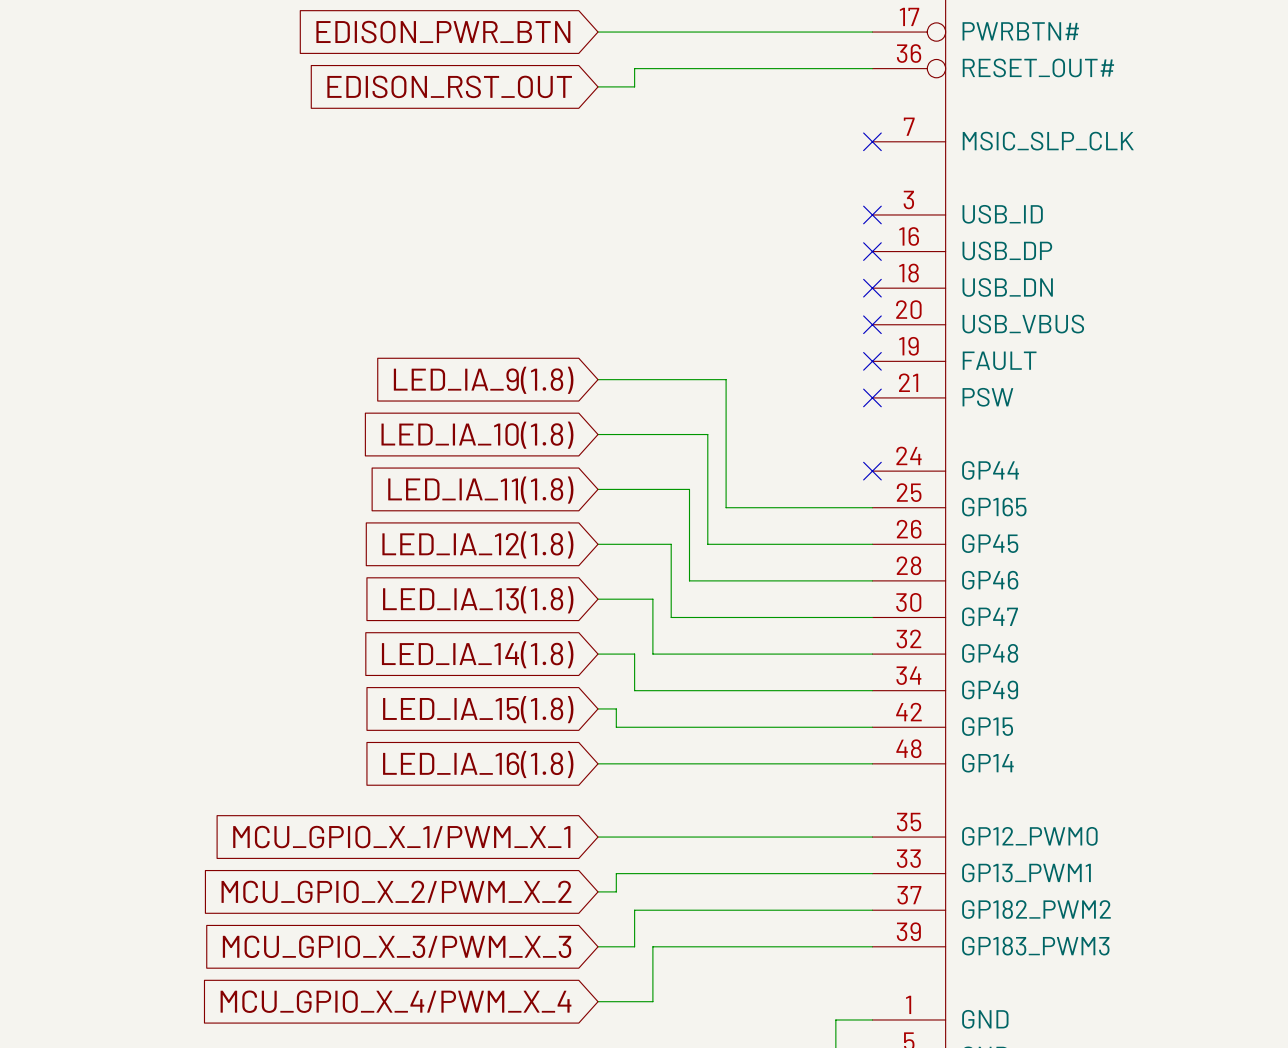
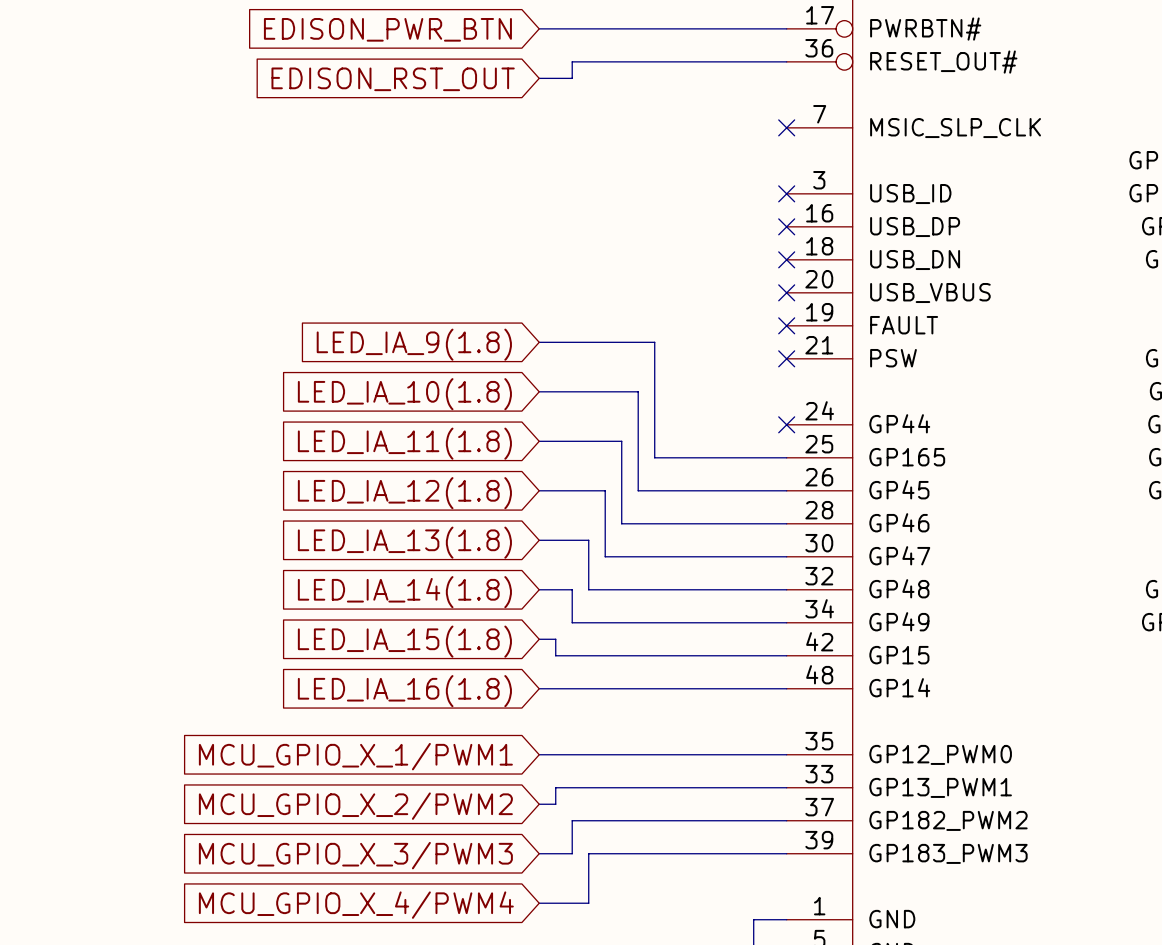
global label: MCU_GPIO_X_1/PWM_X_1 (401, 837) -> MCU_GPIO_X_1/PWM1 (355, 756)
global label: MCU_GPIO_X_2/PWM_X_2 (396, 891) -> MCU_GPIO_X_2/PWM2 (355, 806)
global label: MCU_GPIO_X_3/PWM_X_3 (397, 946) -> MCU_GPIO_X_3/PWM3 (355, 855)
global label: MCU_GPIO_X_4/PWM_X_4 (395, 1001) -> MCU_GPIO_X_4/PWM4 (356, 905)

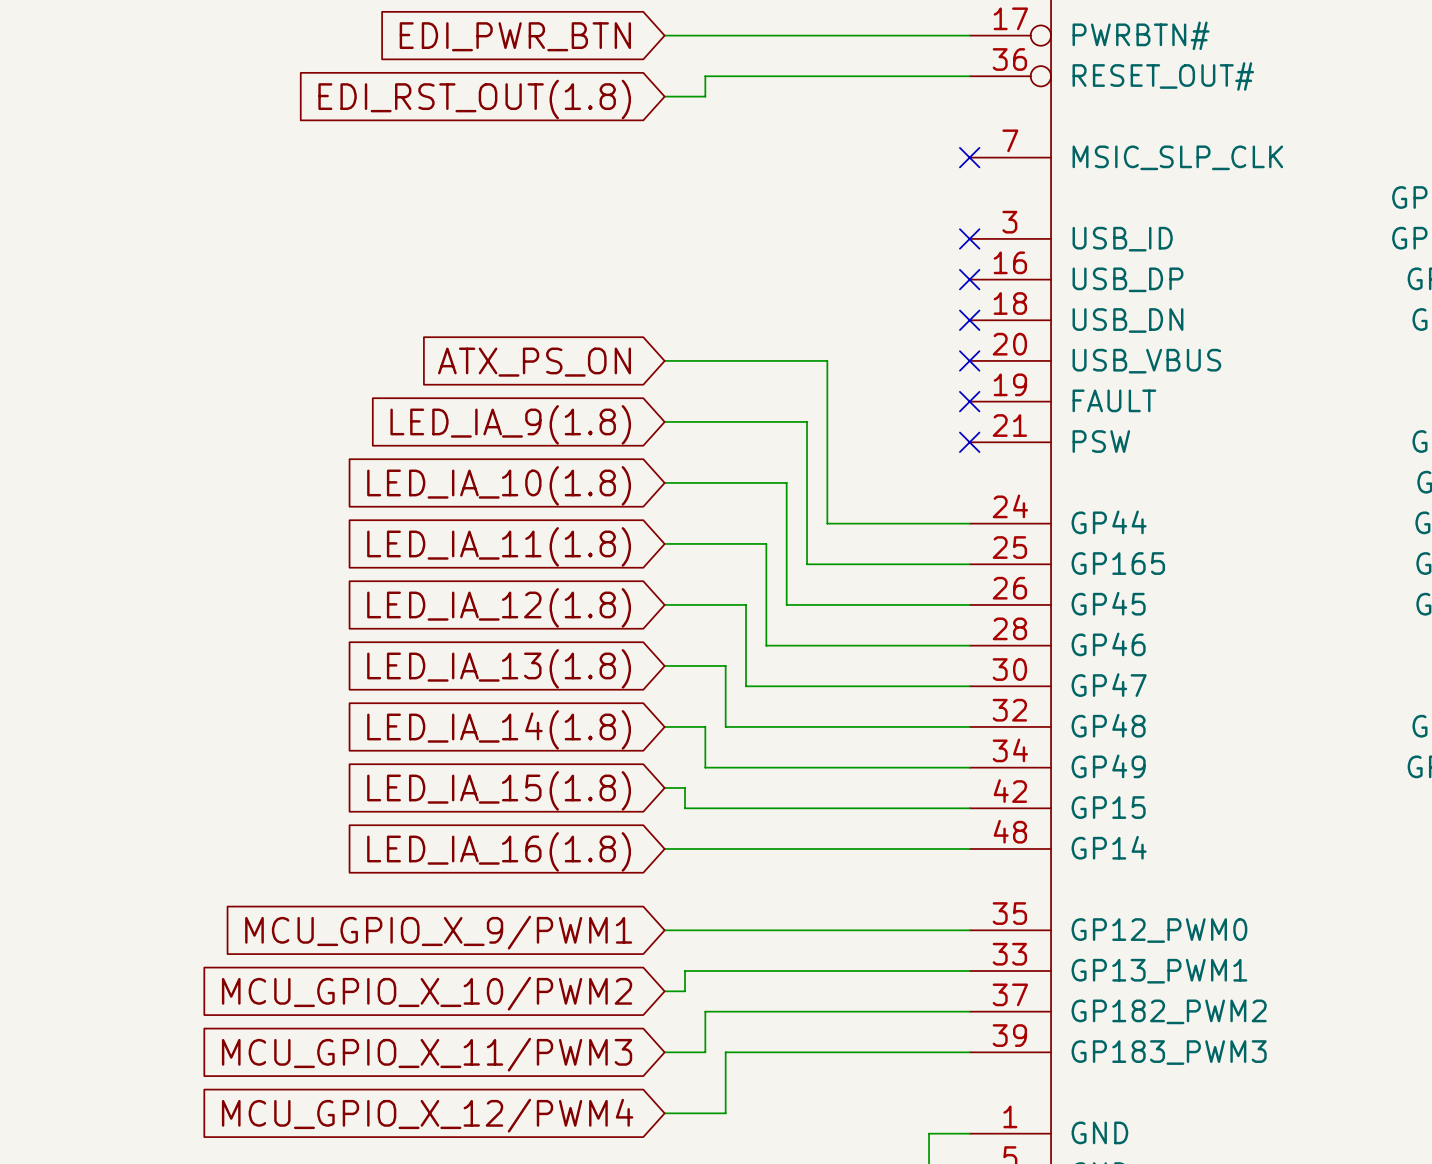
global label: EDISON_PWR_BTN (387, 29) -> EDI_PWR_BTN (515, 36)
global label: EDISON_RST_OUT (393, 79) -> EDI_RST_OUT(1.8) (474, 99)
wire: none -> (664, 360) (827, 360) (827, 523) (969, 523)
global label: none -> ATX_PS_ON (534, 362)
no-connect mark: (786, 424) -> none
global label: MCU_GPIO_X_1/PWM1 (355, 756) -> MCU_GPIO_X_9/PWM1 (438, 932)
global label: MCU_GPIO_X_2/PWM2 (355, 806) -> MCU_GPIO_X_10/PWM2 (427, 993)
global label: MCU_GPIO_X_3/PWM3 (355, 855) -> MCU_GPIO_X_11/PWM3 (427, 1054)
global label: MCU_GPIO_X_4/PWM4 (356, 905) -> MCU_GPIO_X_12/PWM4 (427, 1115)

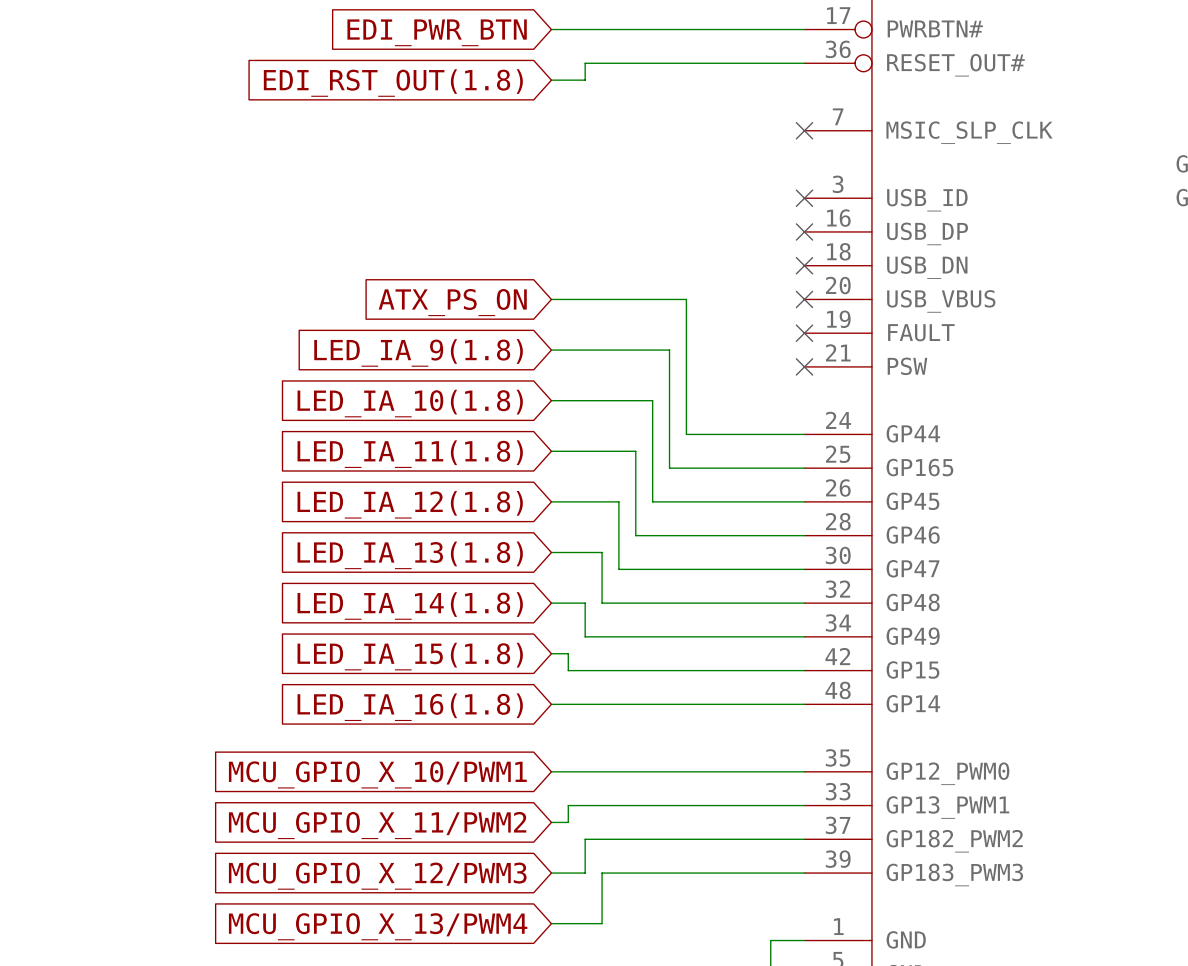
global label: MCU_GPIO_X_9/PWM1 (438, 932) -> MCU_GPIO_X_10/PWM1 (377, 774)
global label: MCU_GPIO_X_10/PWM2 (427, 993) -> MCU_GPIO_X_11/PWM2 (377, 825)
global label: MCU_GPIO_X_11/PWM3 (427, 1054) -> MCU_GPIO_X_12/PWM3 (377, 876)
global label: MCU_GPIO_X_12/PWM4 (427, 1115) -> MCU_GPIO_X_13/PWM4 (378, 926)

